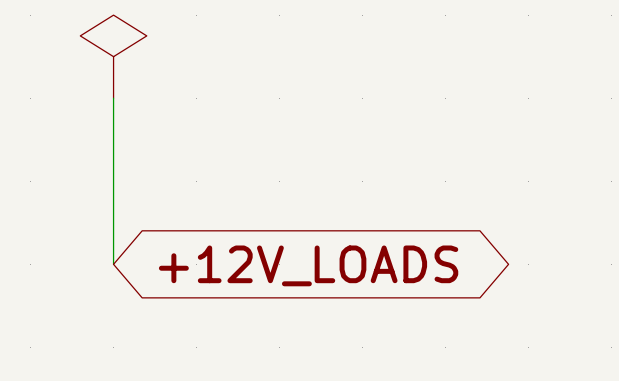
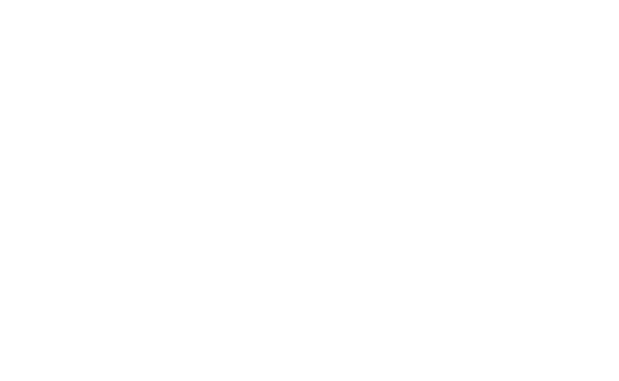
power symbol: (113, 56) -> none
wire: (113, 98) (113, 264) -> none
global label: +12V_LOADS (308, 265) -> none

